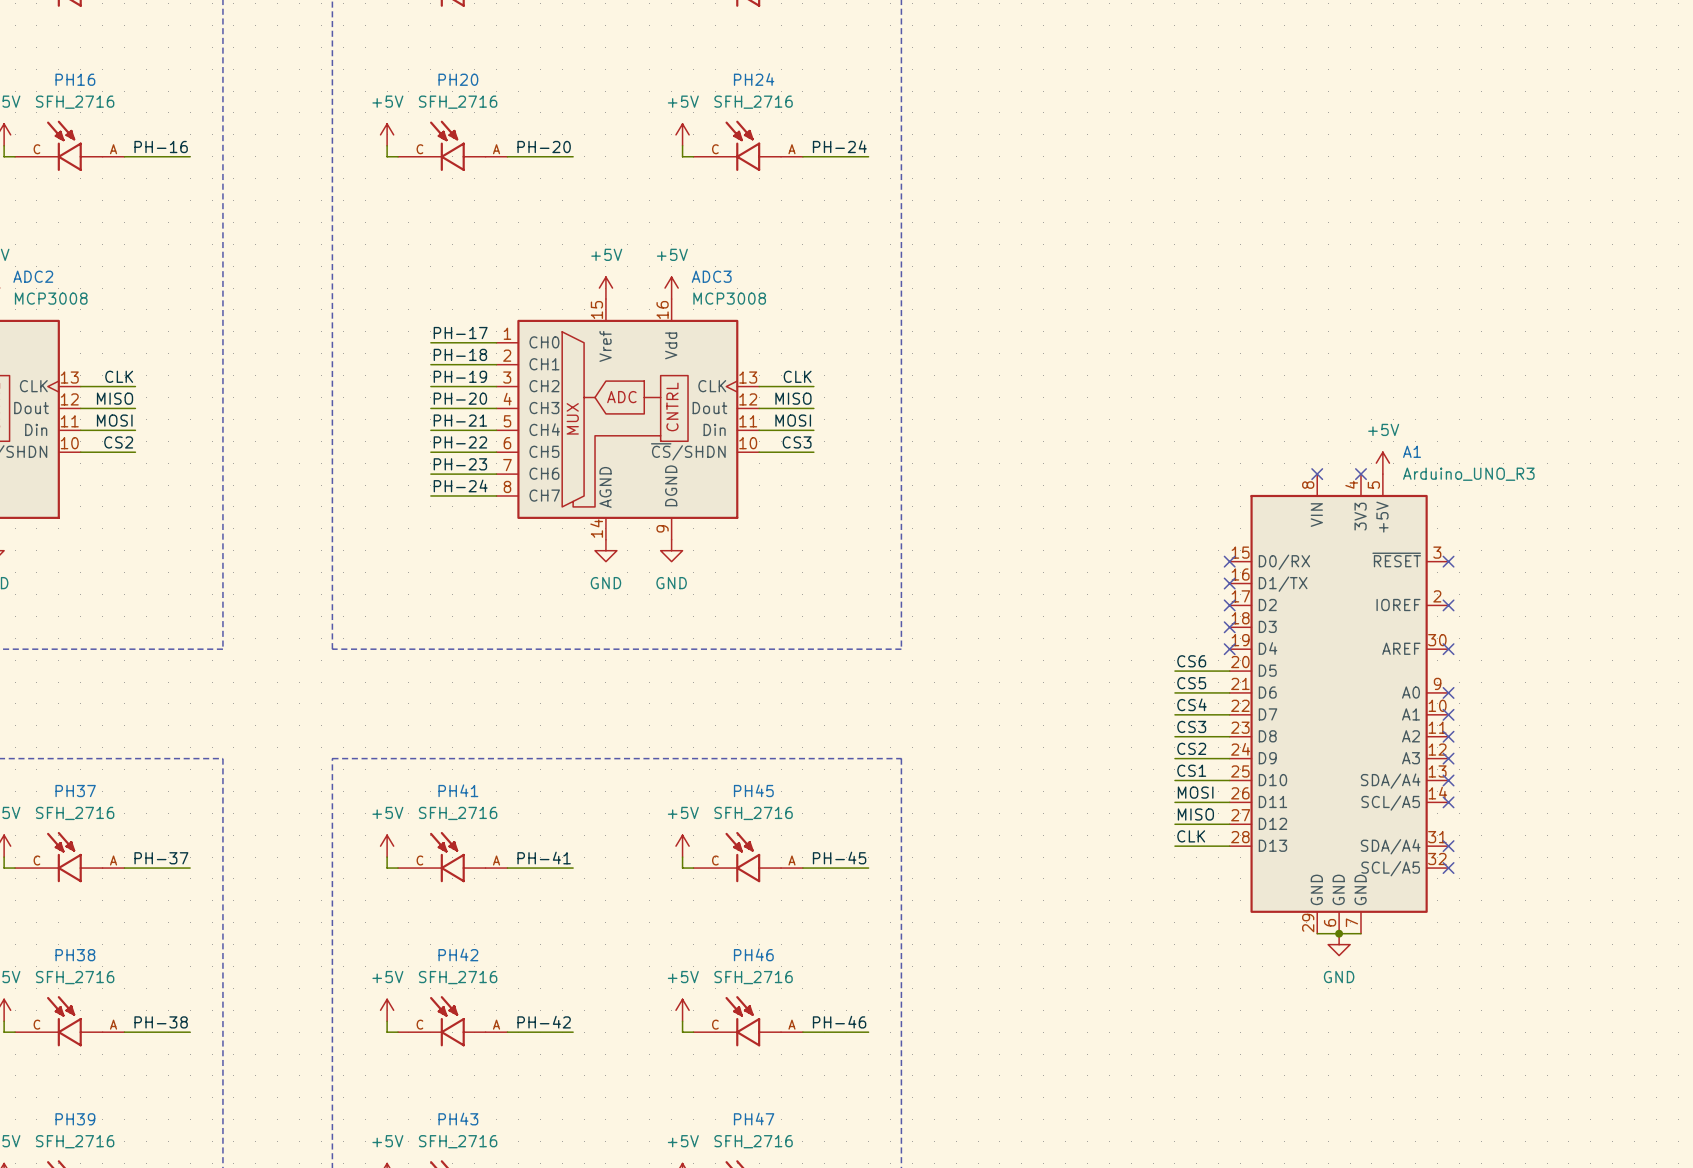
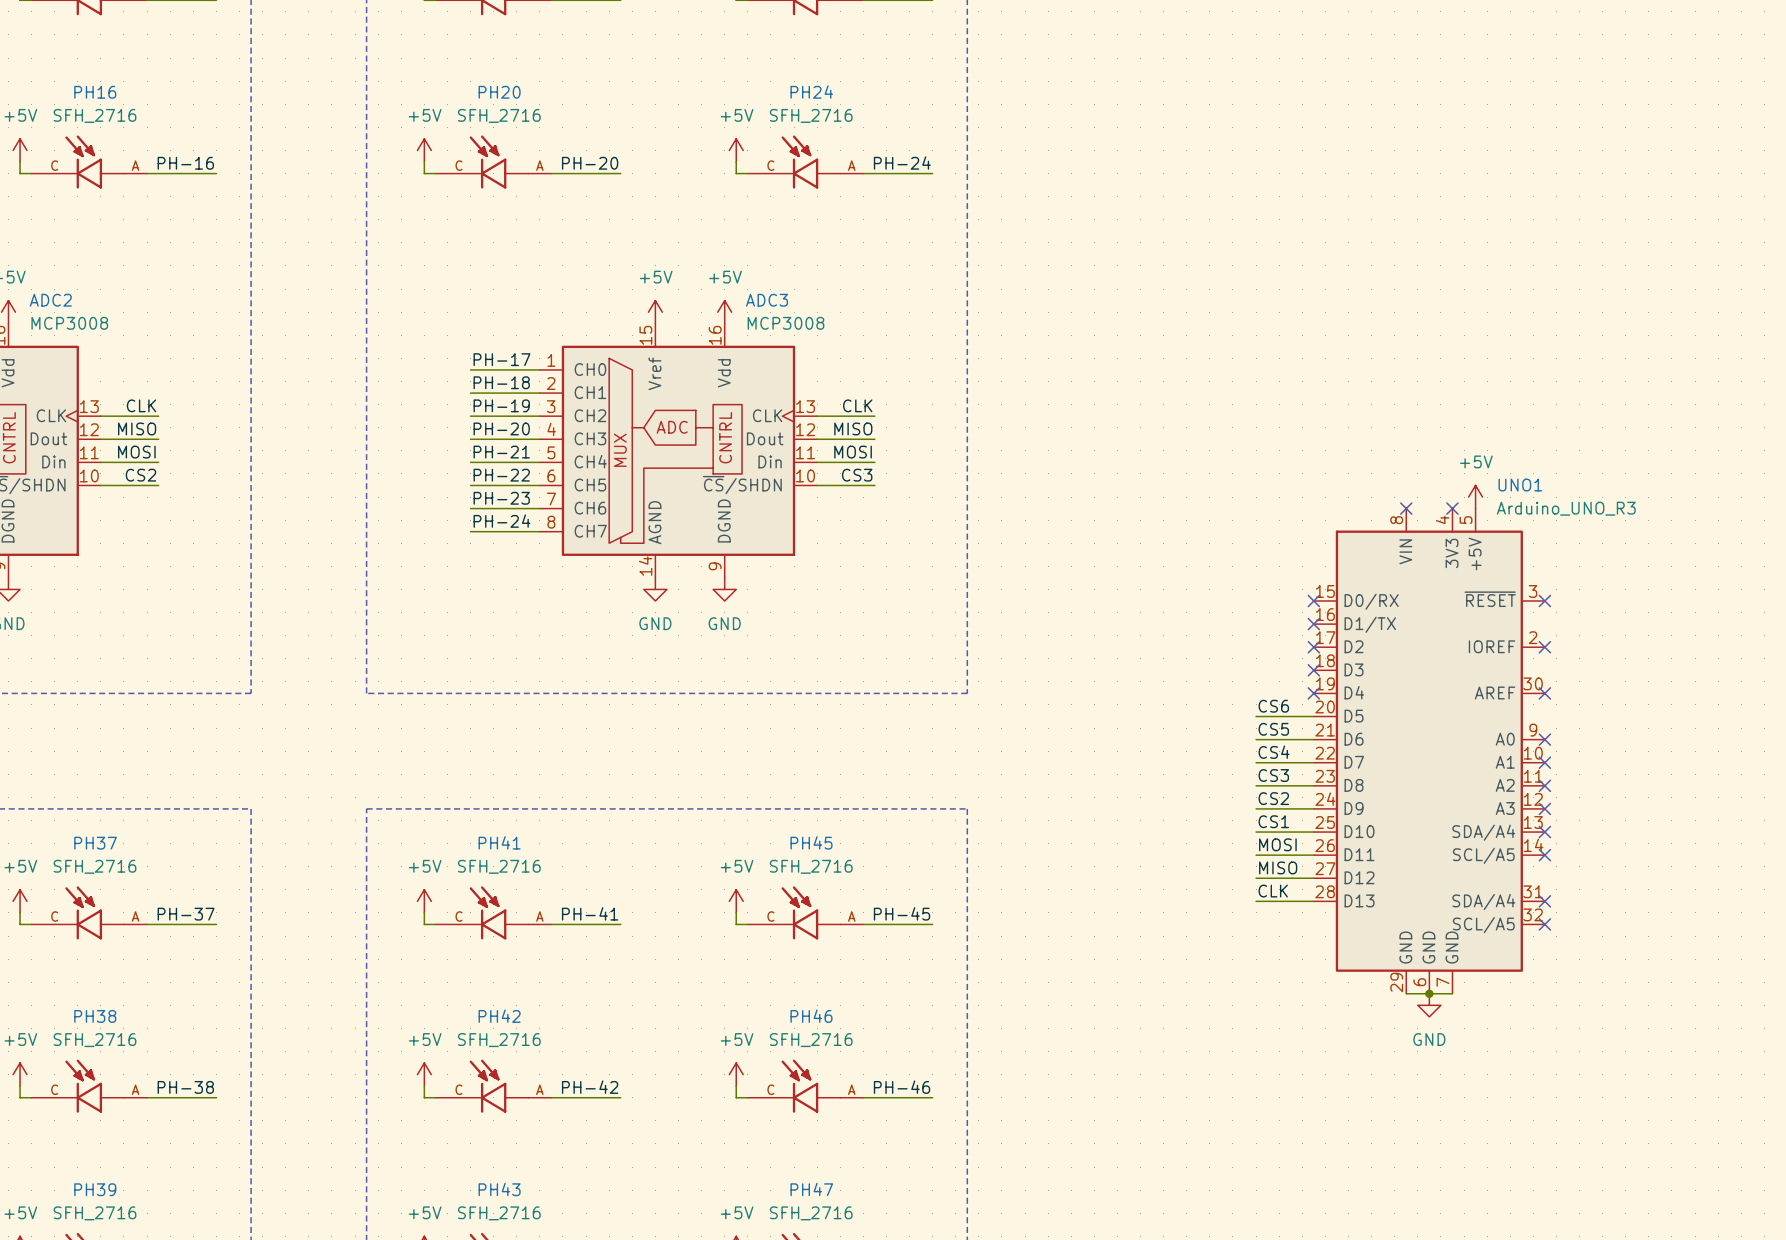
A1 name: A1 (1412, 451) -> UNO1 (1520, 485)

